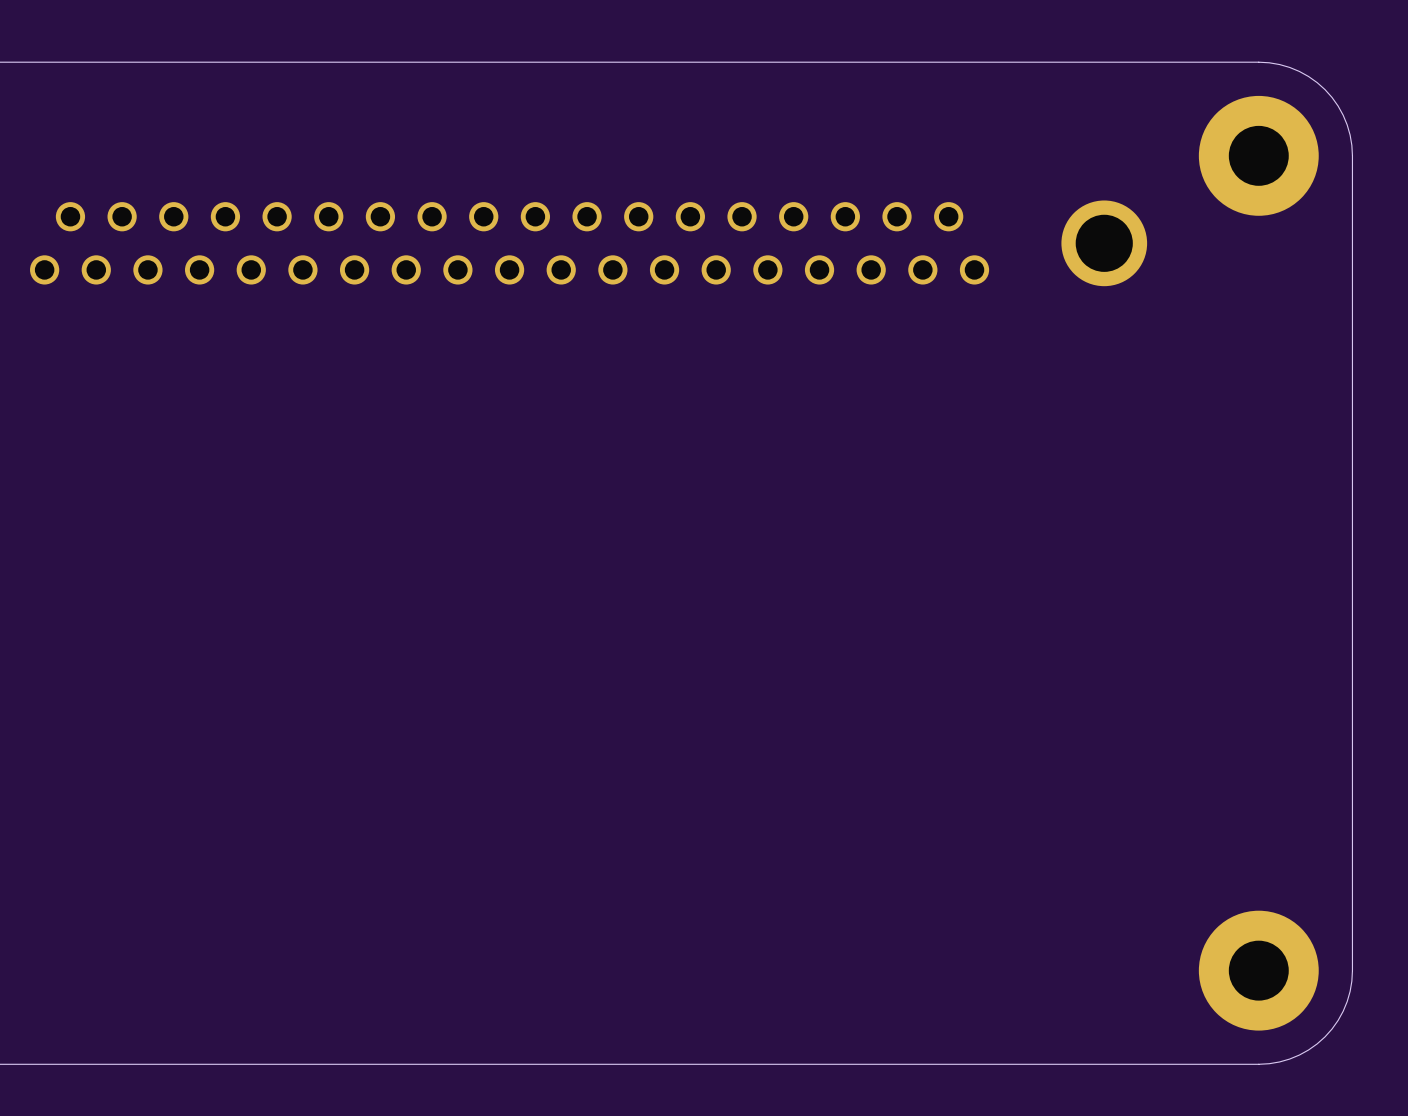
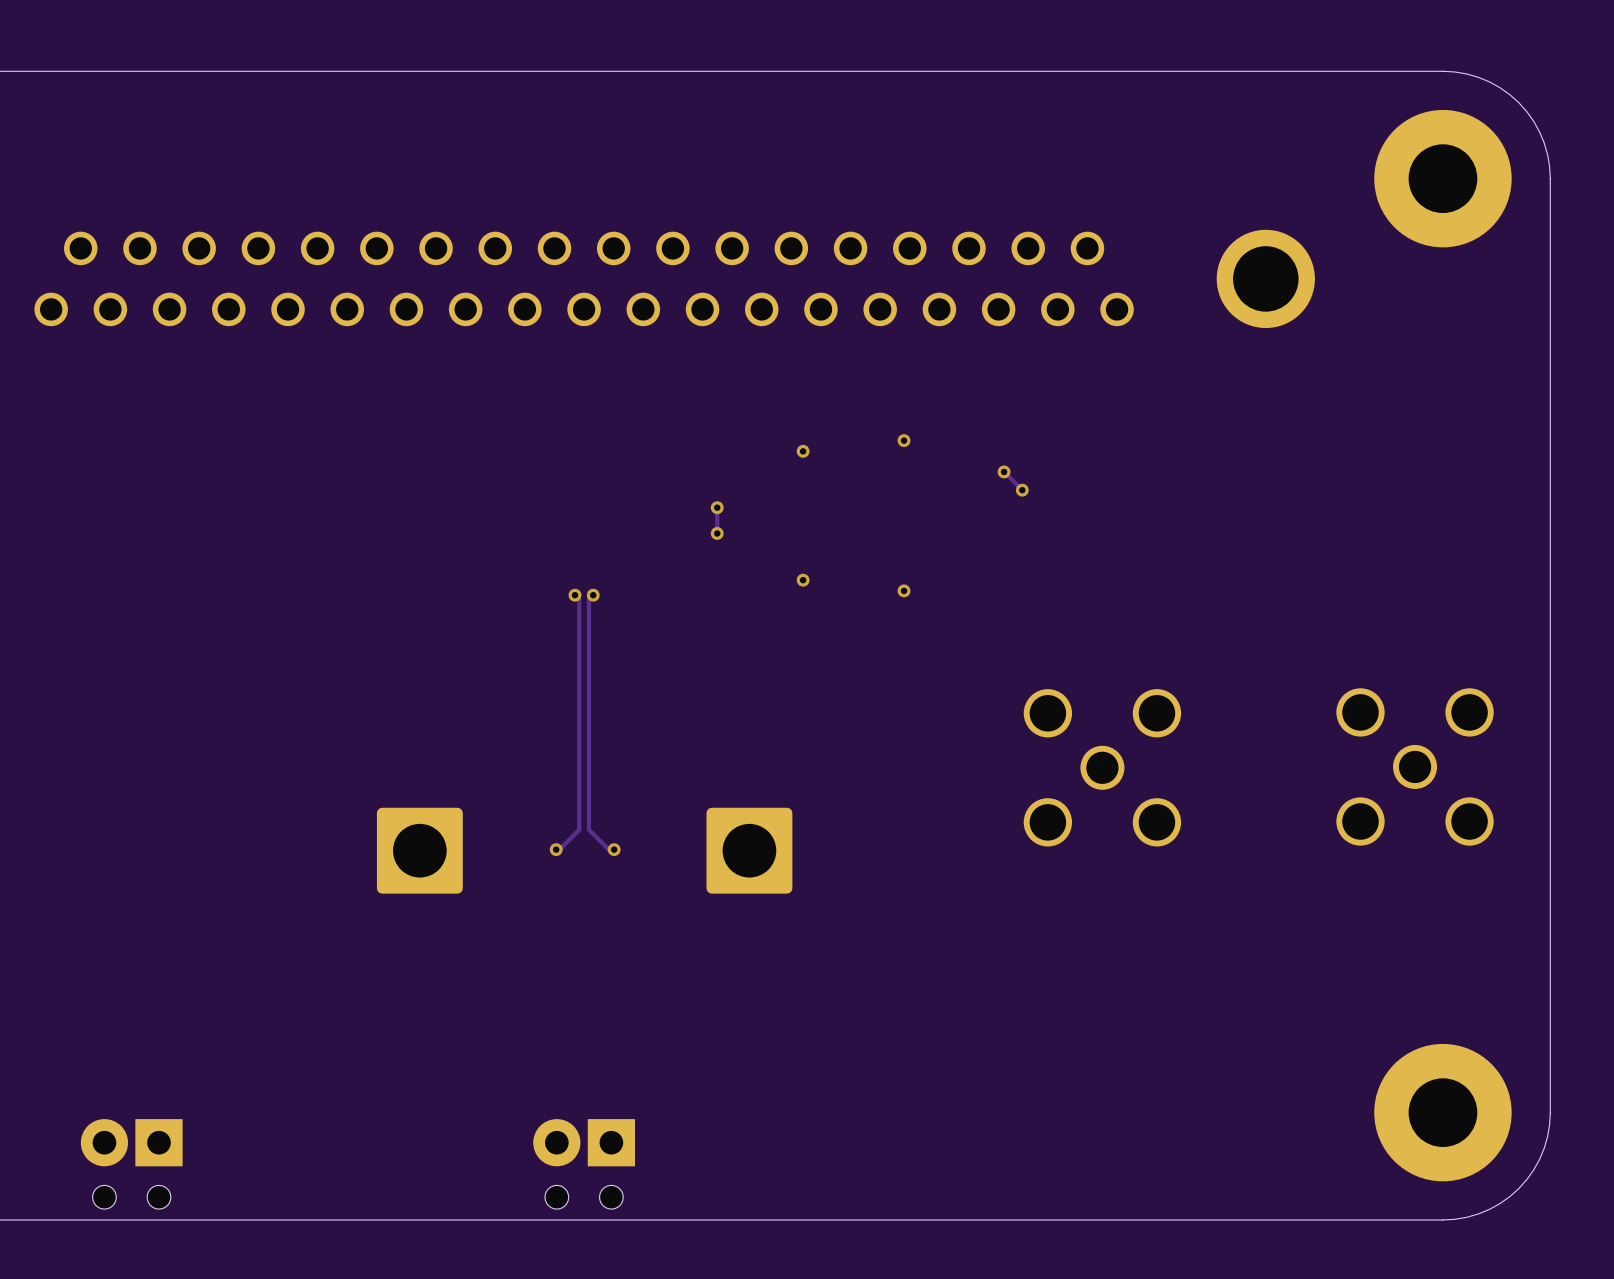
via: none -> (904, 440)
via: none -> (803, 451)
track: none -> (1004, 471) (1022, 490)
via: none -> (1004, 471)
via: none -> (1022, 490)
track: none -> (717, 507) (717, 533)
via: none -> (717, 507)
via: none -> (717, 533)
via: none -> (803, 580)
via: none -> (904, 590)
track: none -> (574, 595) (579, 599) (579, 829) (559, 849) (556, 849)
via: none -> (574, 595)
track: none -> (593, 595) (588, 599) (588, 829) (608, 849) (614, 849)
via: none -> (593, 595)
part: none -> (1102, 767)
part: none -> (1415, 766)
via: none -> (556, 849)
via: none -> (614, 849)
part: none -> (419, 850)
part: none -> (749, 850)
part: none -> (131, 1164)
part: none -> (584, 1164)

